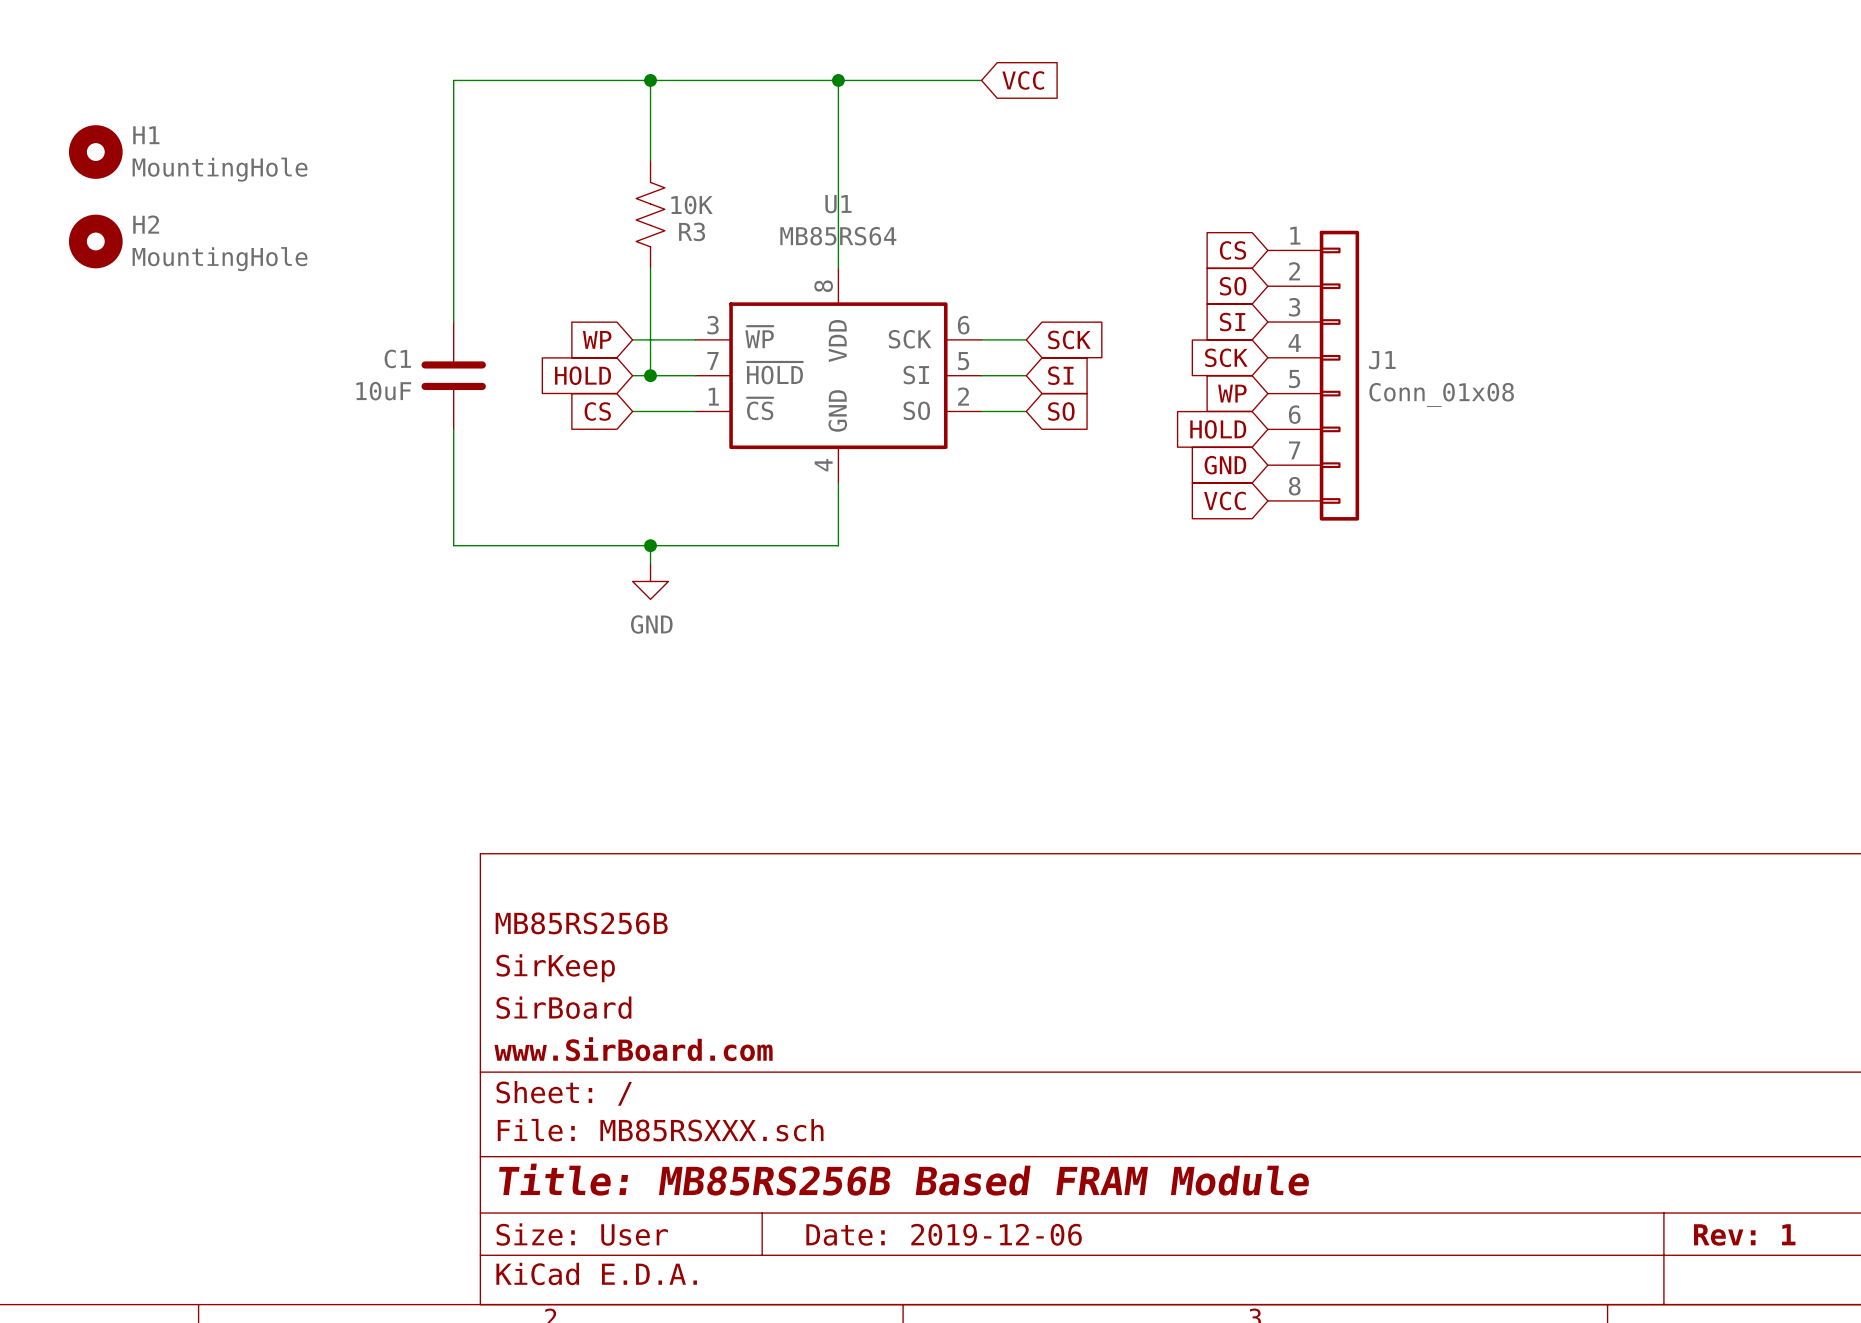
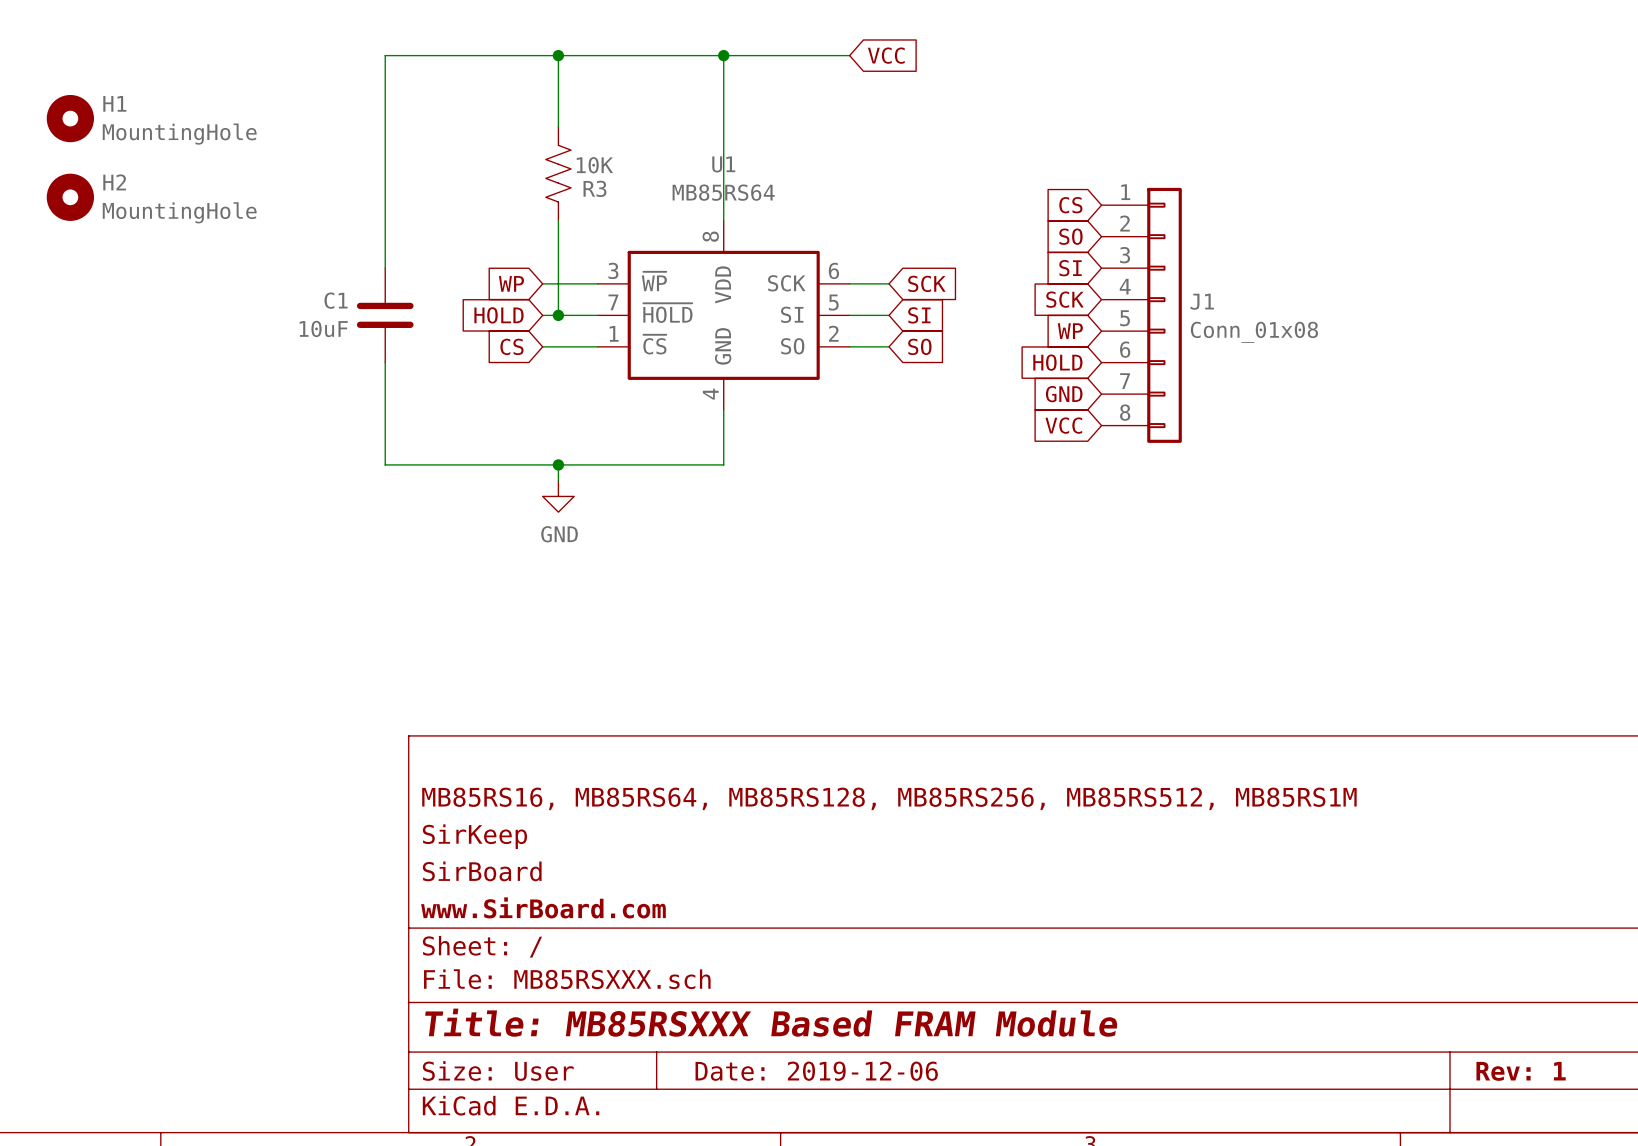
title block: MB85RS256B (581, 923) -> MB85RS16, MB85RS64, MB85RS128, MB85RS256, MB85RS512, MB85RS1M (889, 798)
title block: Title: MB85RS256B Based FRAM Module (904, 1179) -> Title: MB85RSXXX Based FRAM Module (771, 1022)

